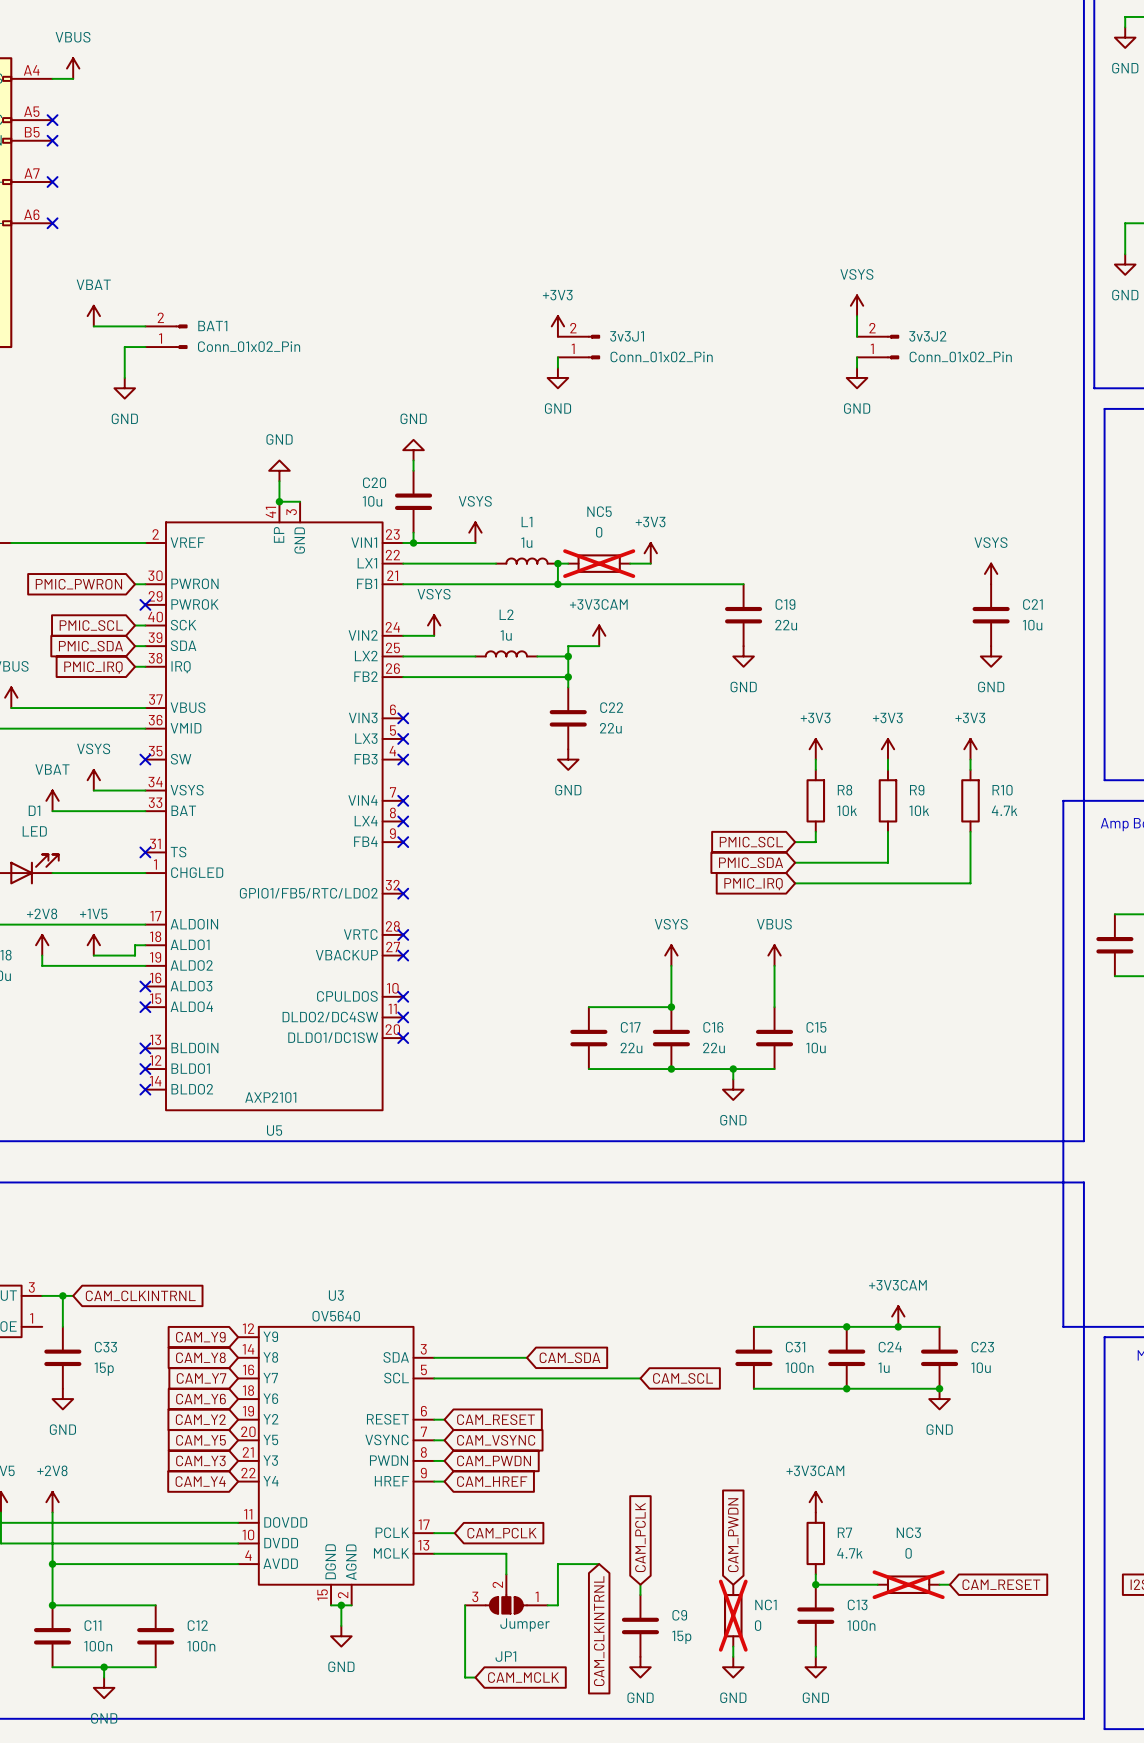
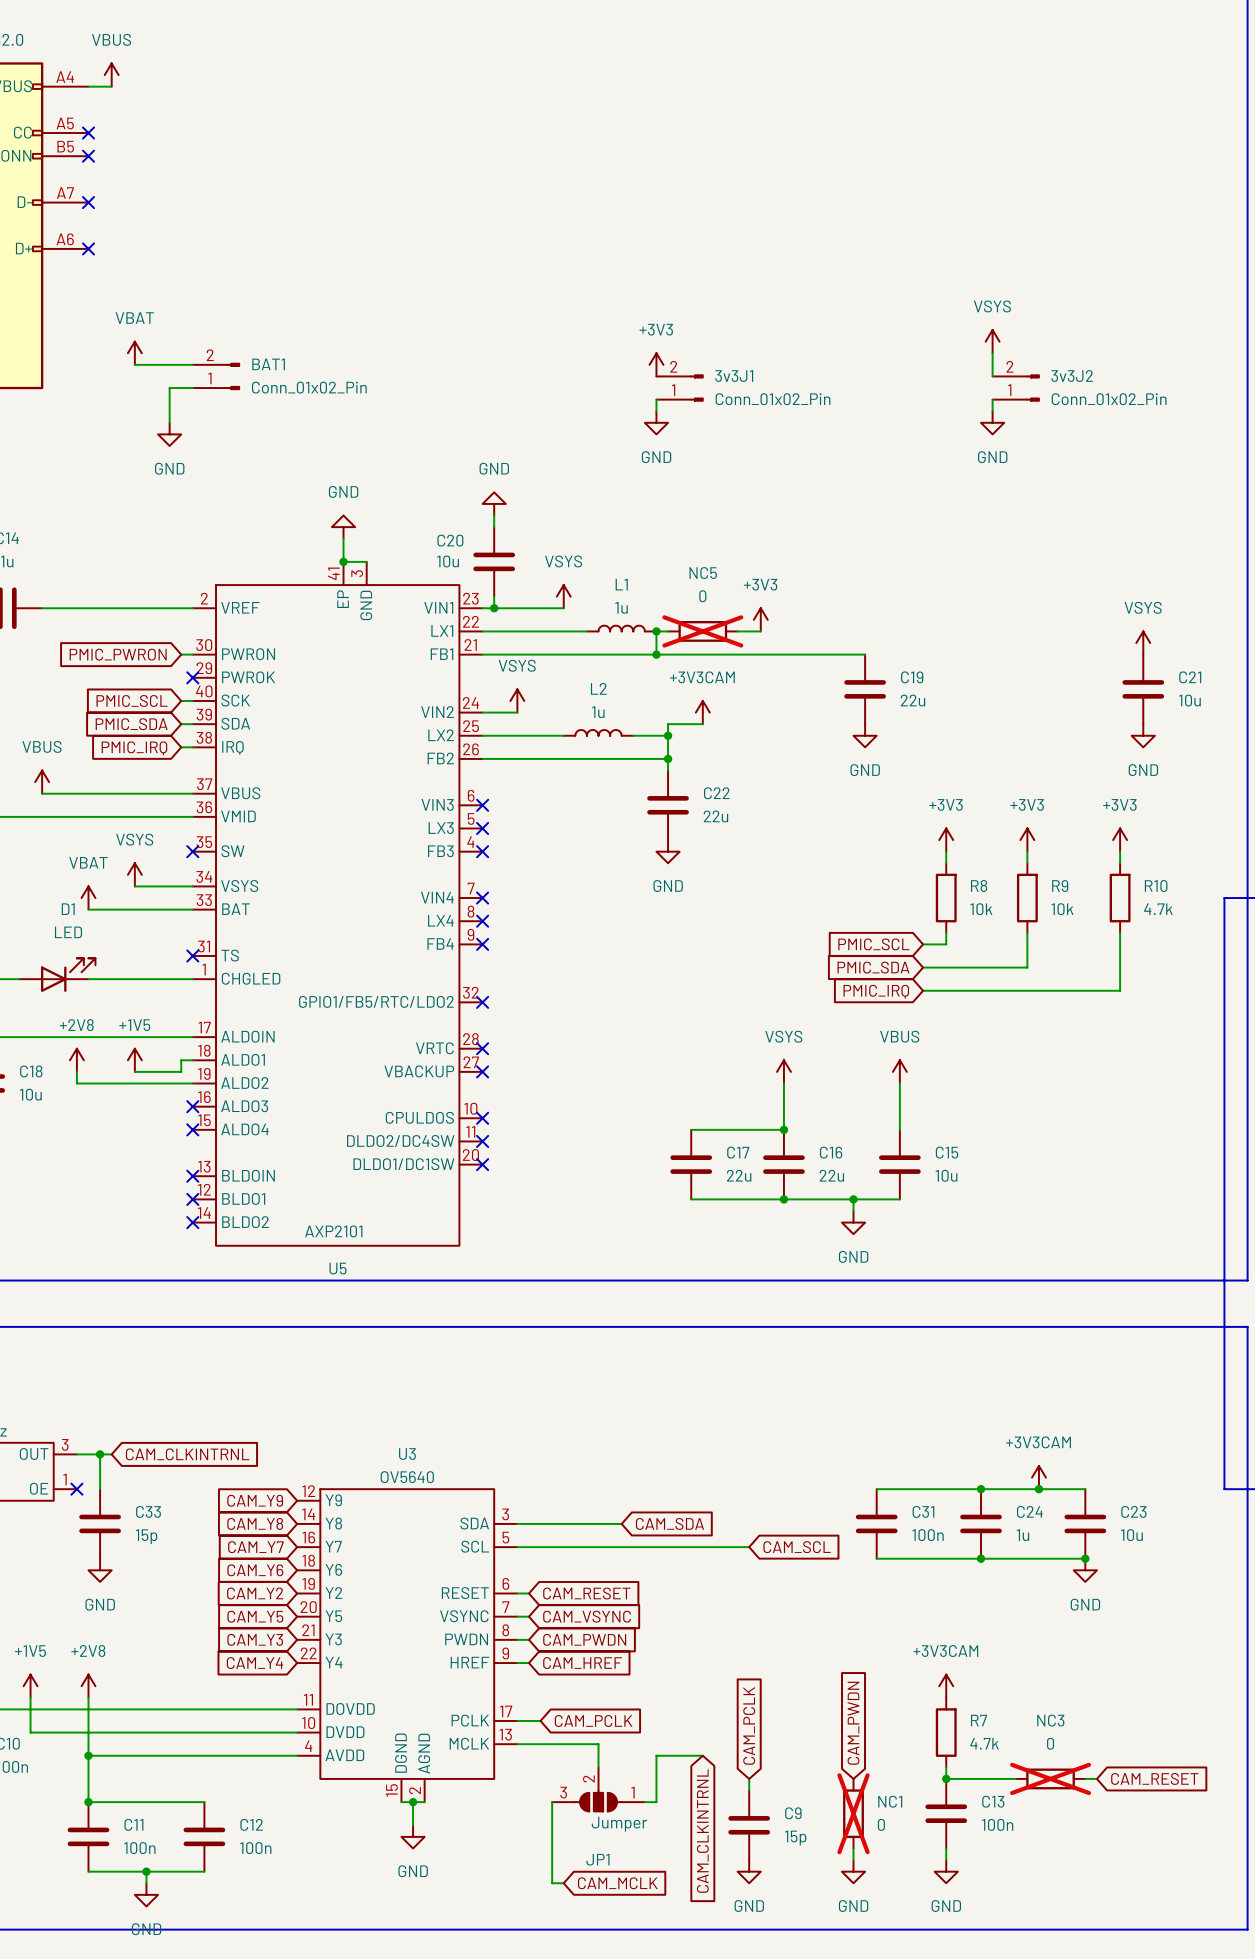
no-connect mark: none -> (76, 1489)

